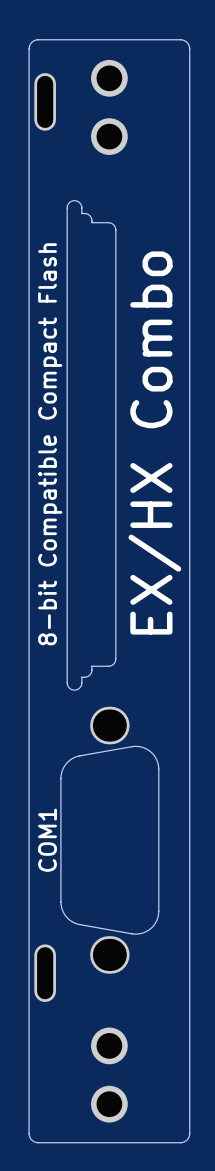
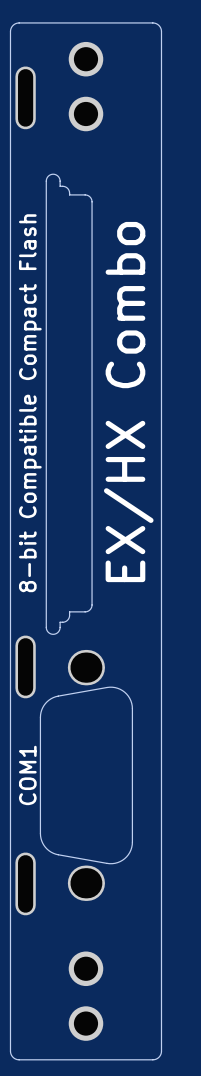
part: (45, 101) -> none
part: none -> (25, 97)
part: none -> (25, 666)
part: none -> (25, 883)
part: (45, 973) -> none

